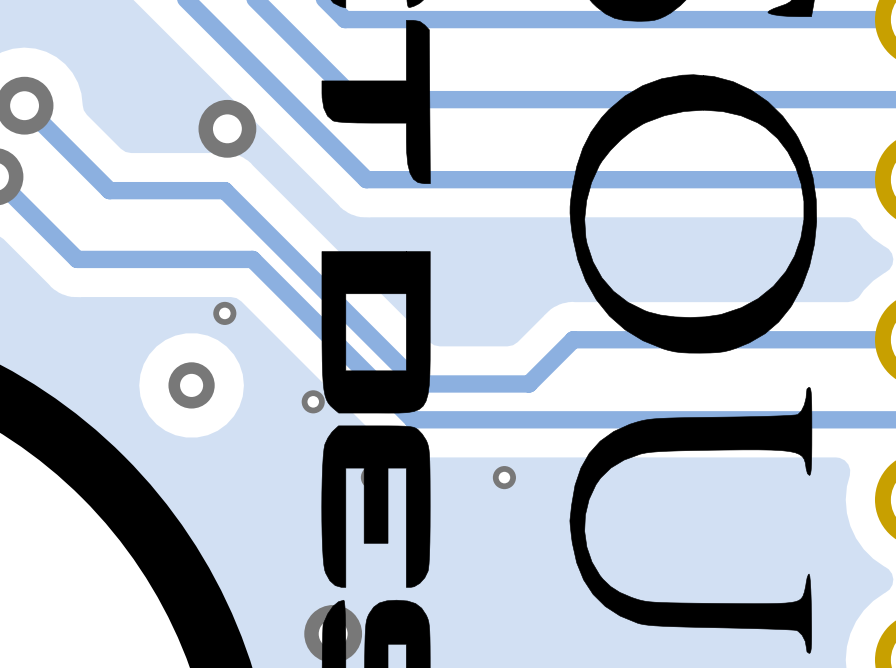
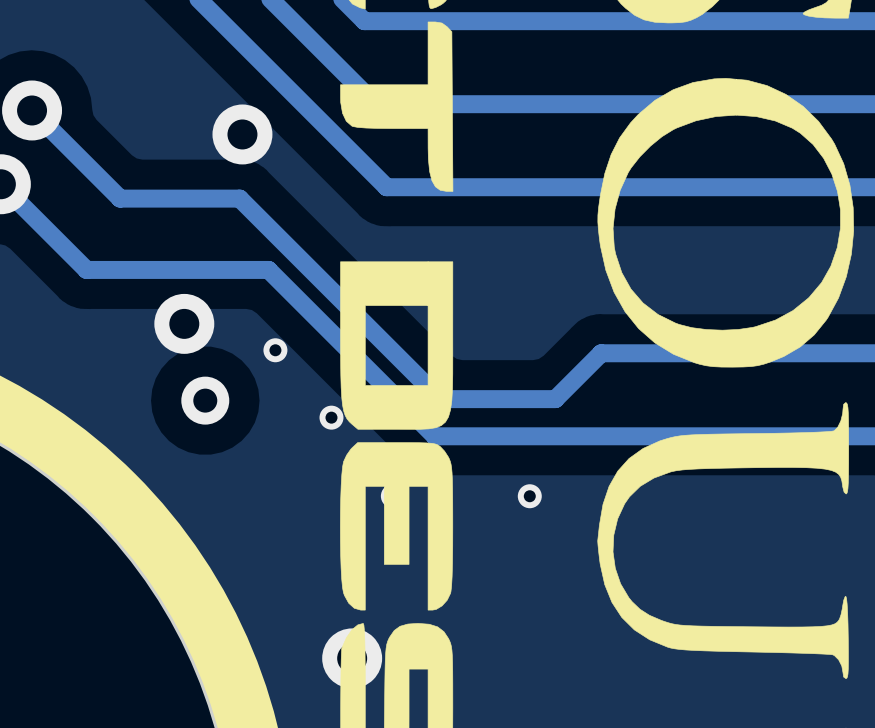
via: none -> (184, 323)
via position: (224, 313) -> (275, 350)

